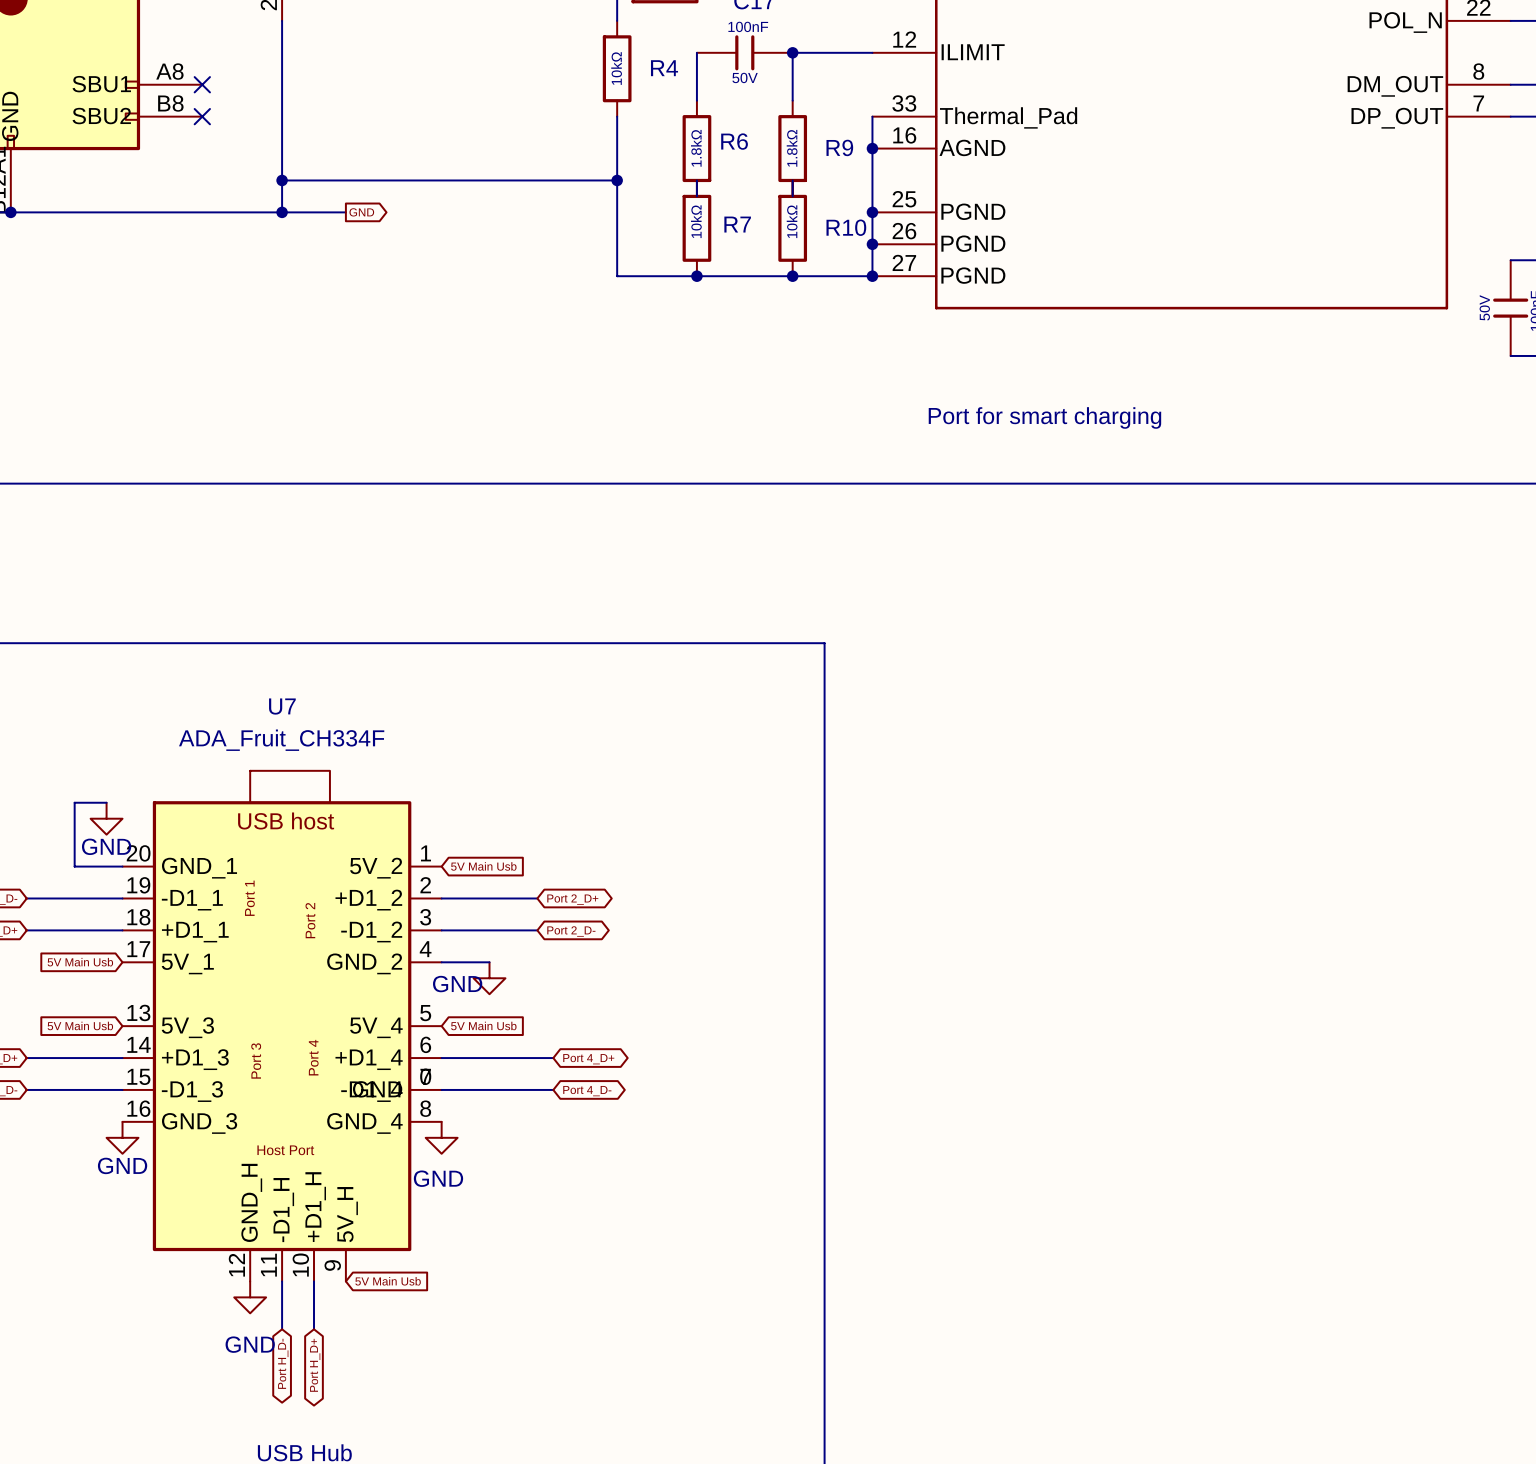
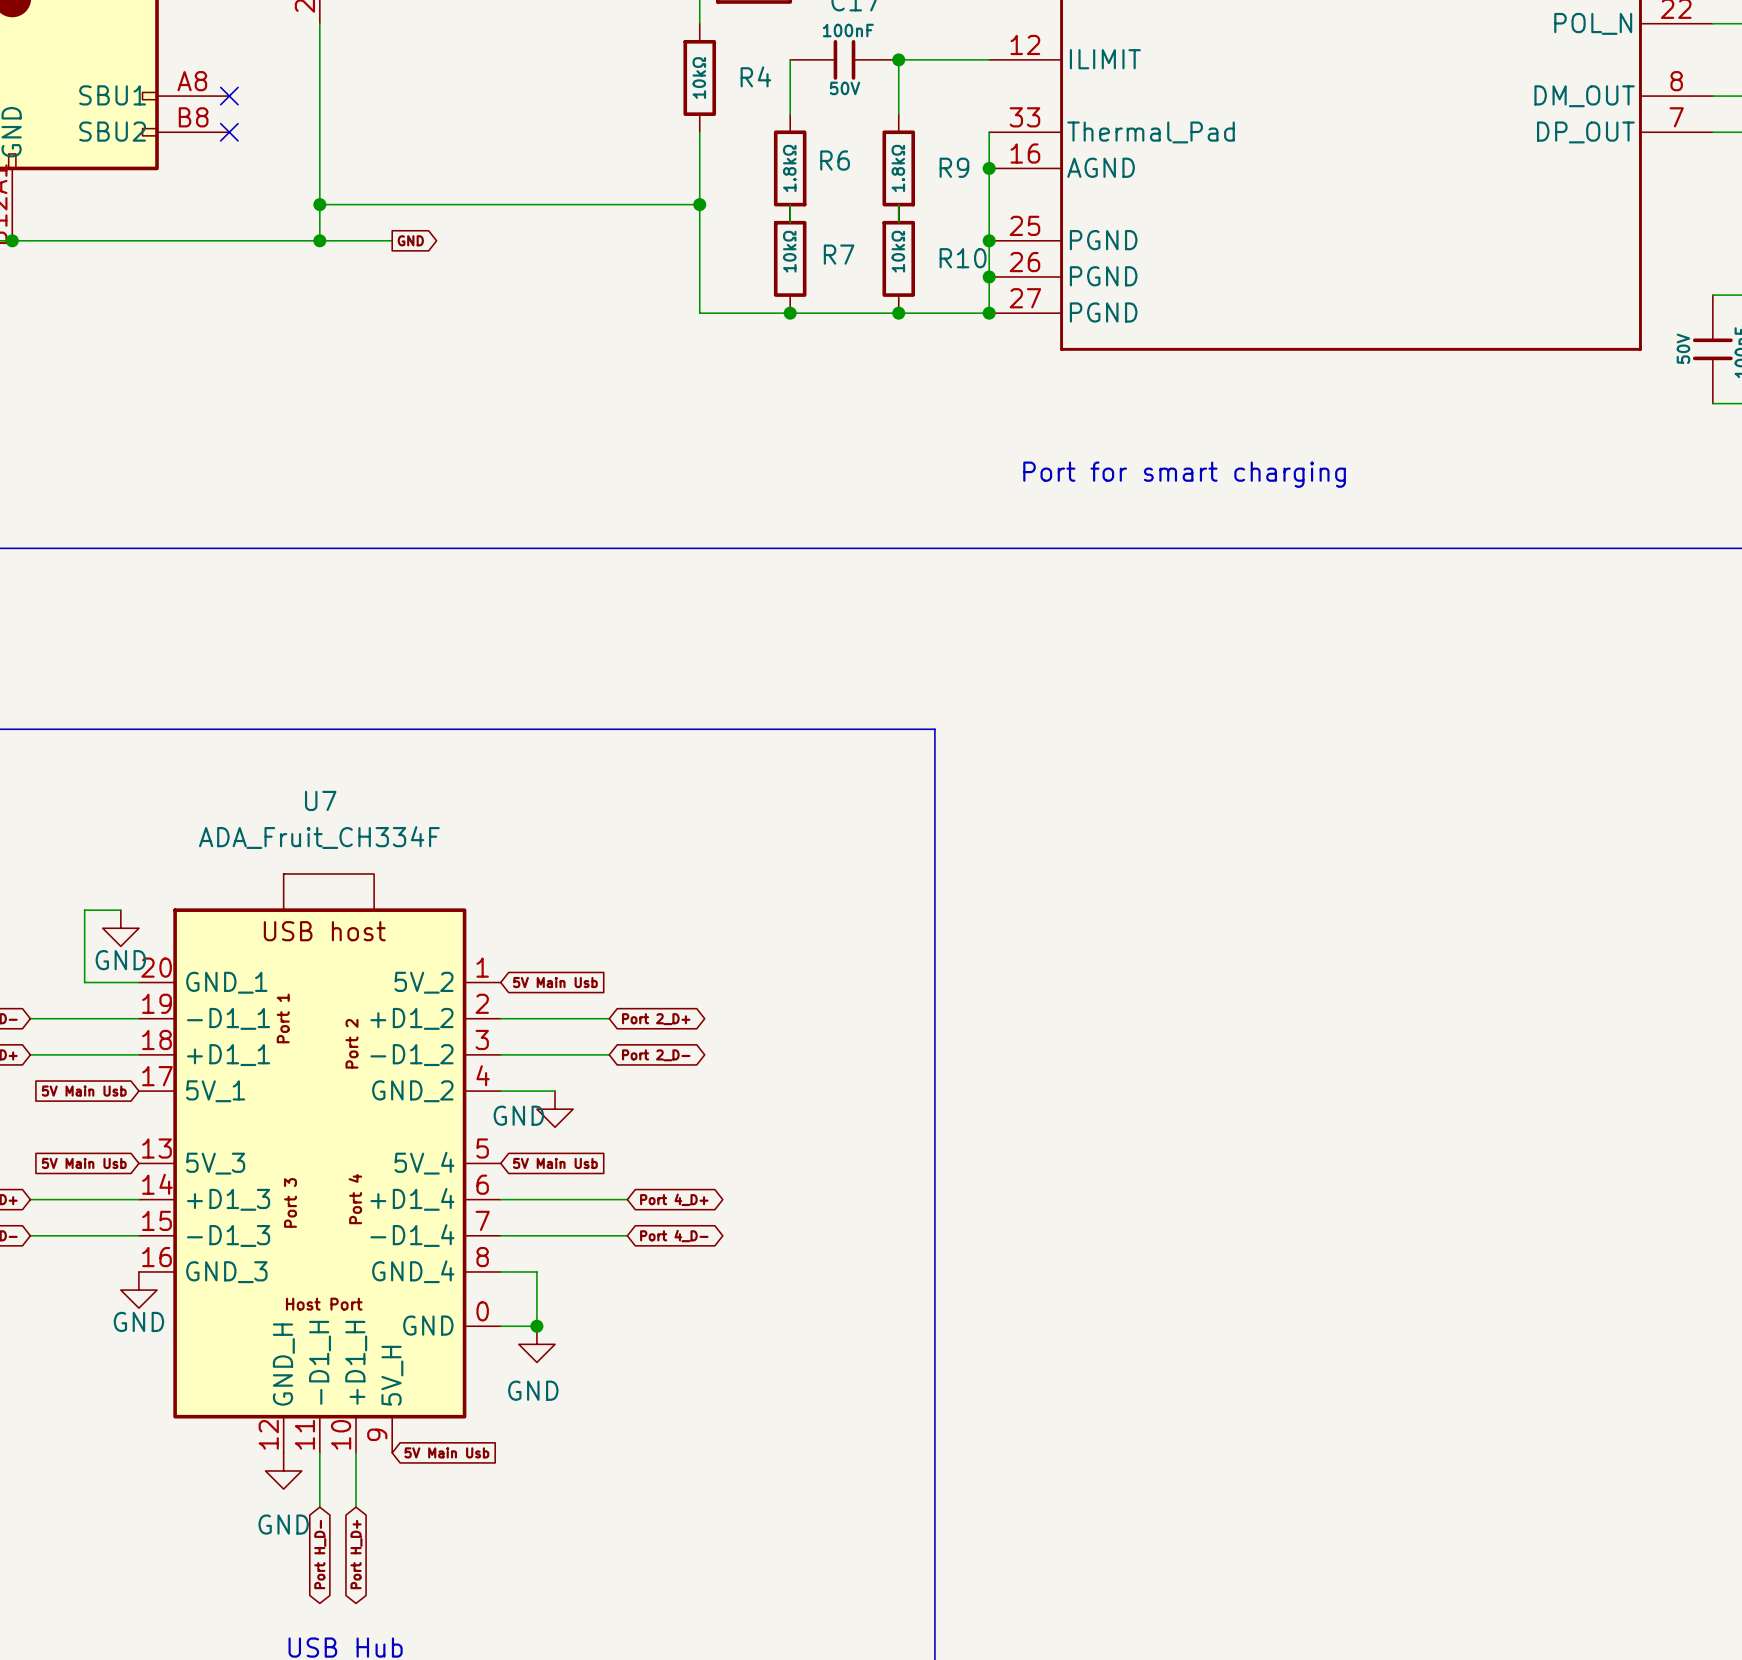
U7 symbol: [122, 770, 442, 1282] -> [138, 873, 501, 1453]
wire: none -> (500, 1271) (536, 1271) (536, 1326) (500, 1326)
power symbol position: GND (441, 1137) -> GND (536, 1344)
junction: none -> (536, 1326)

